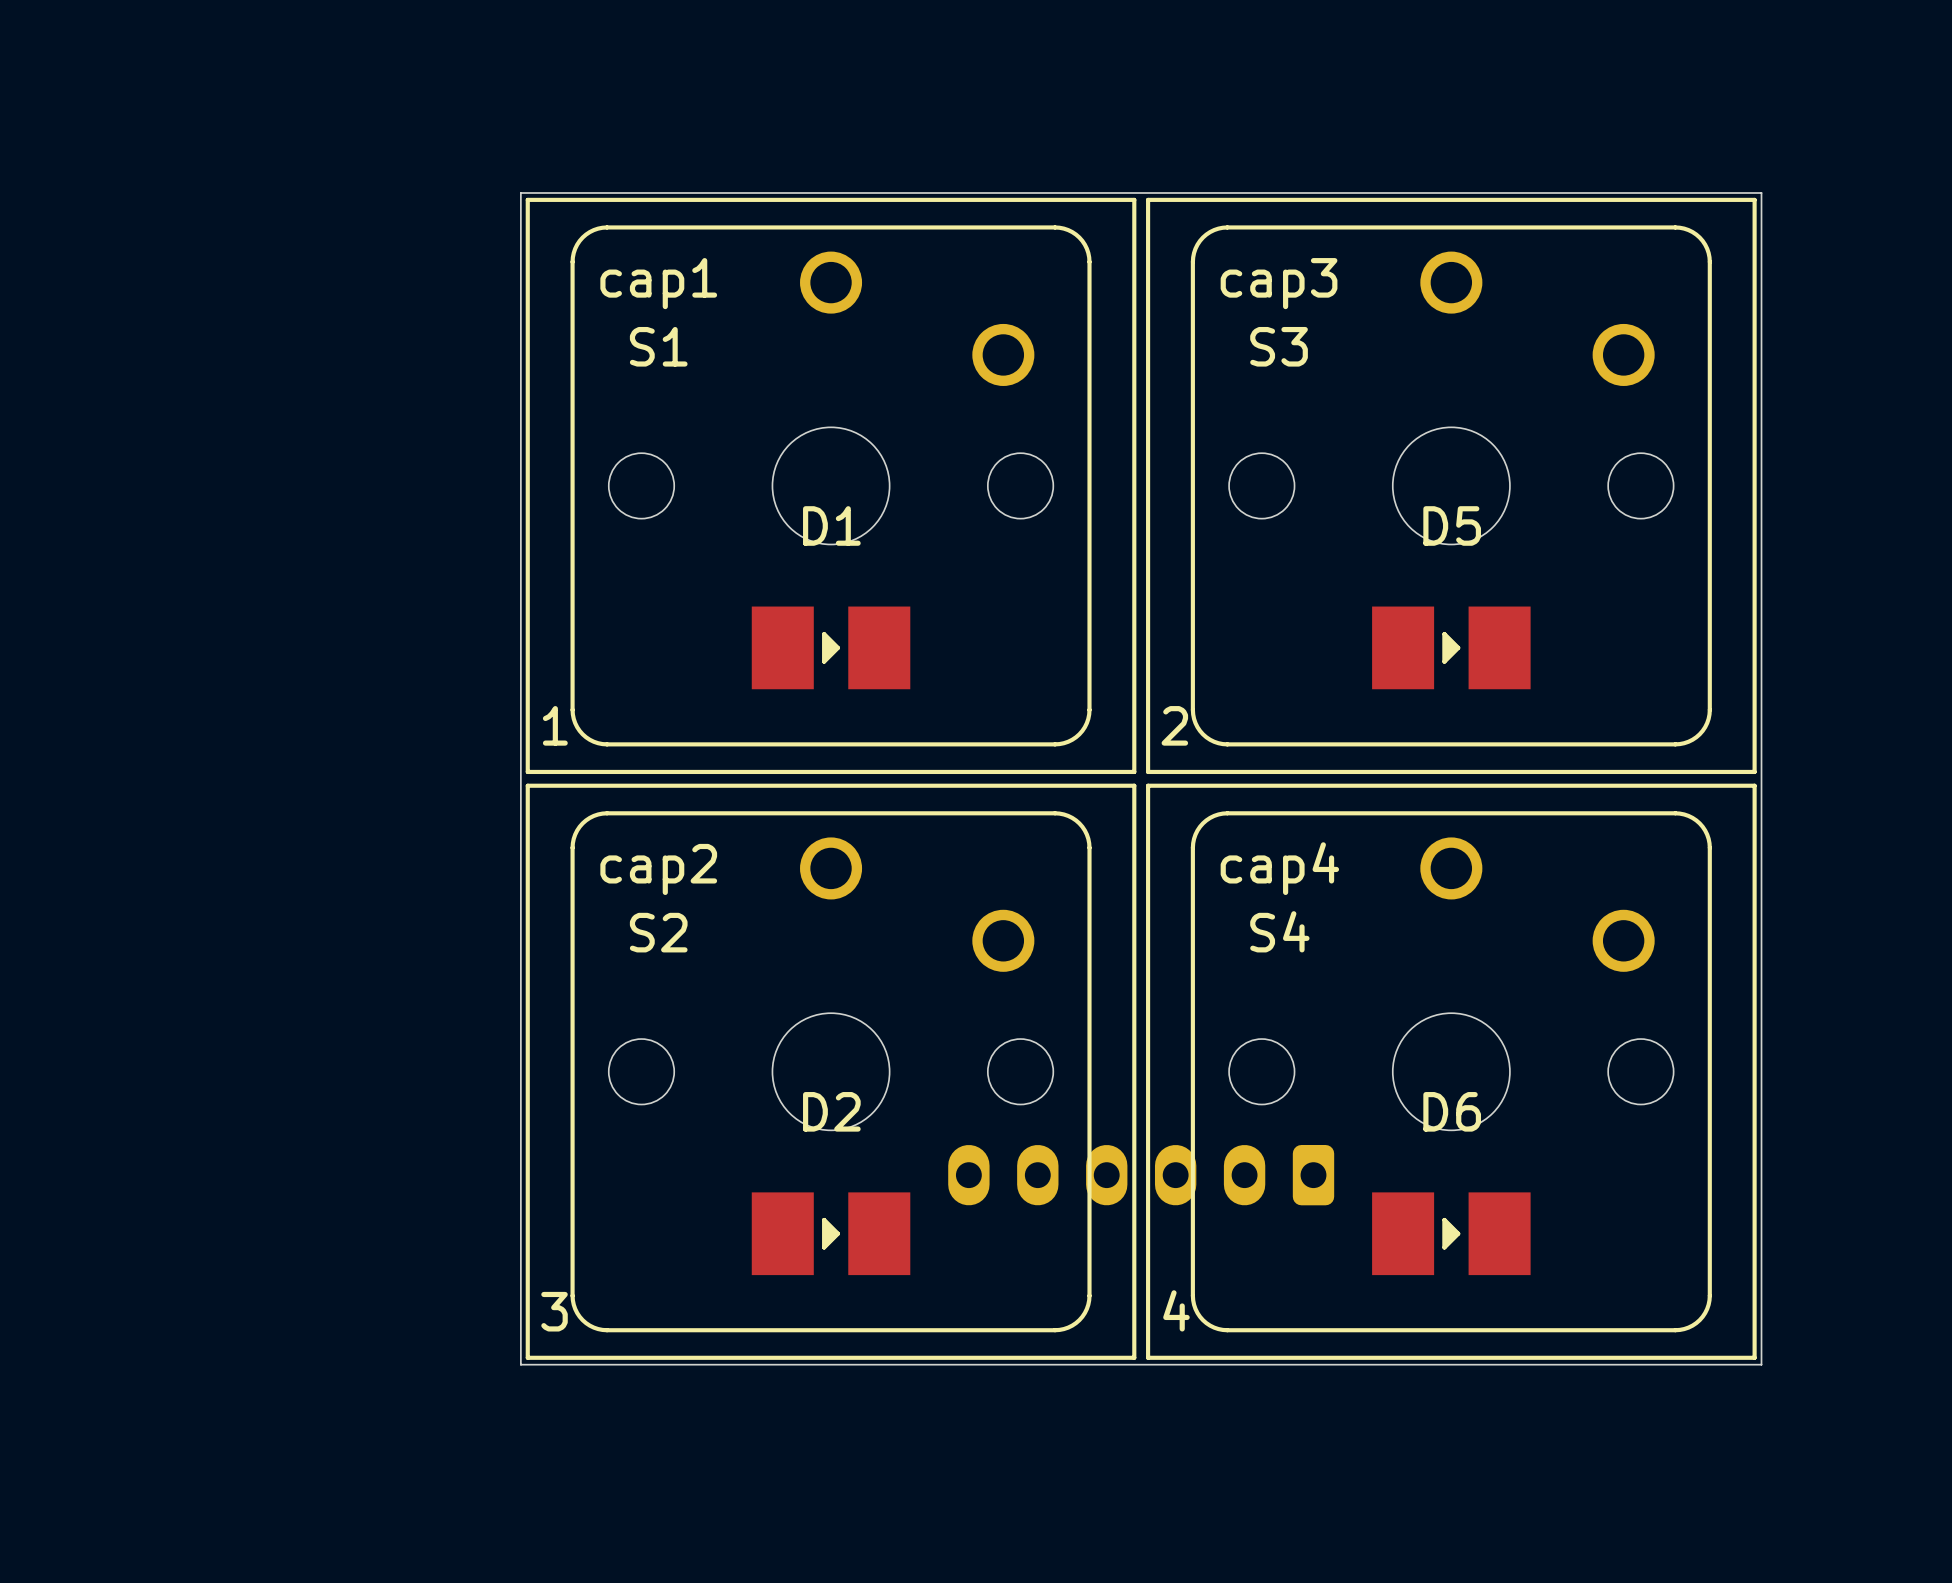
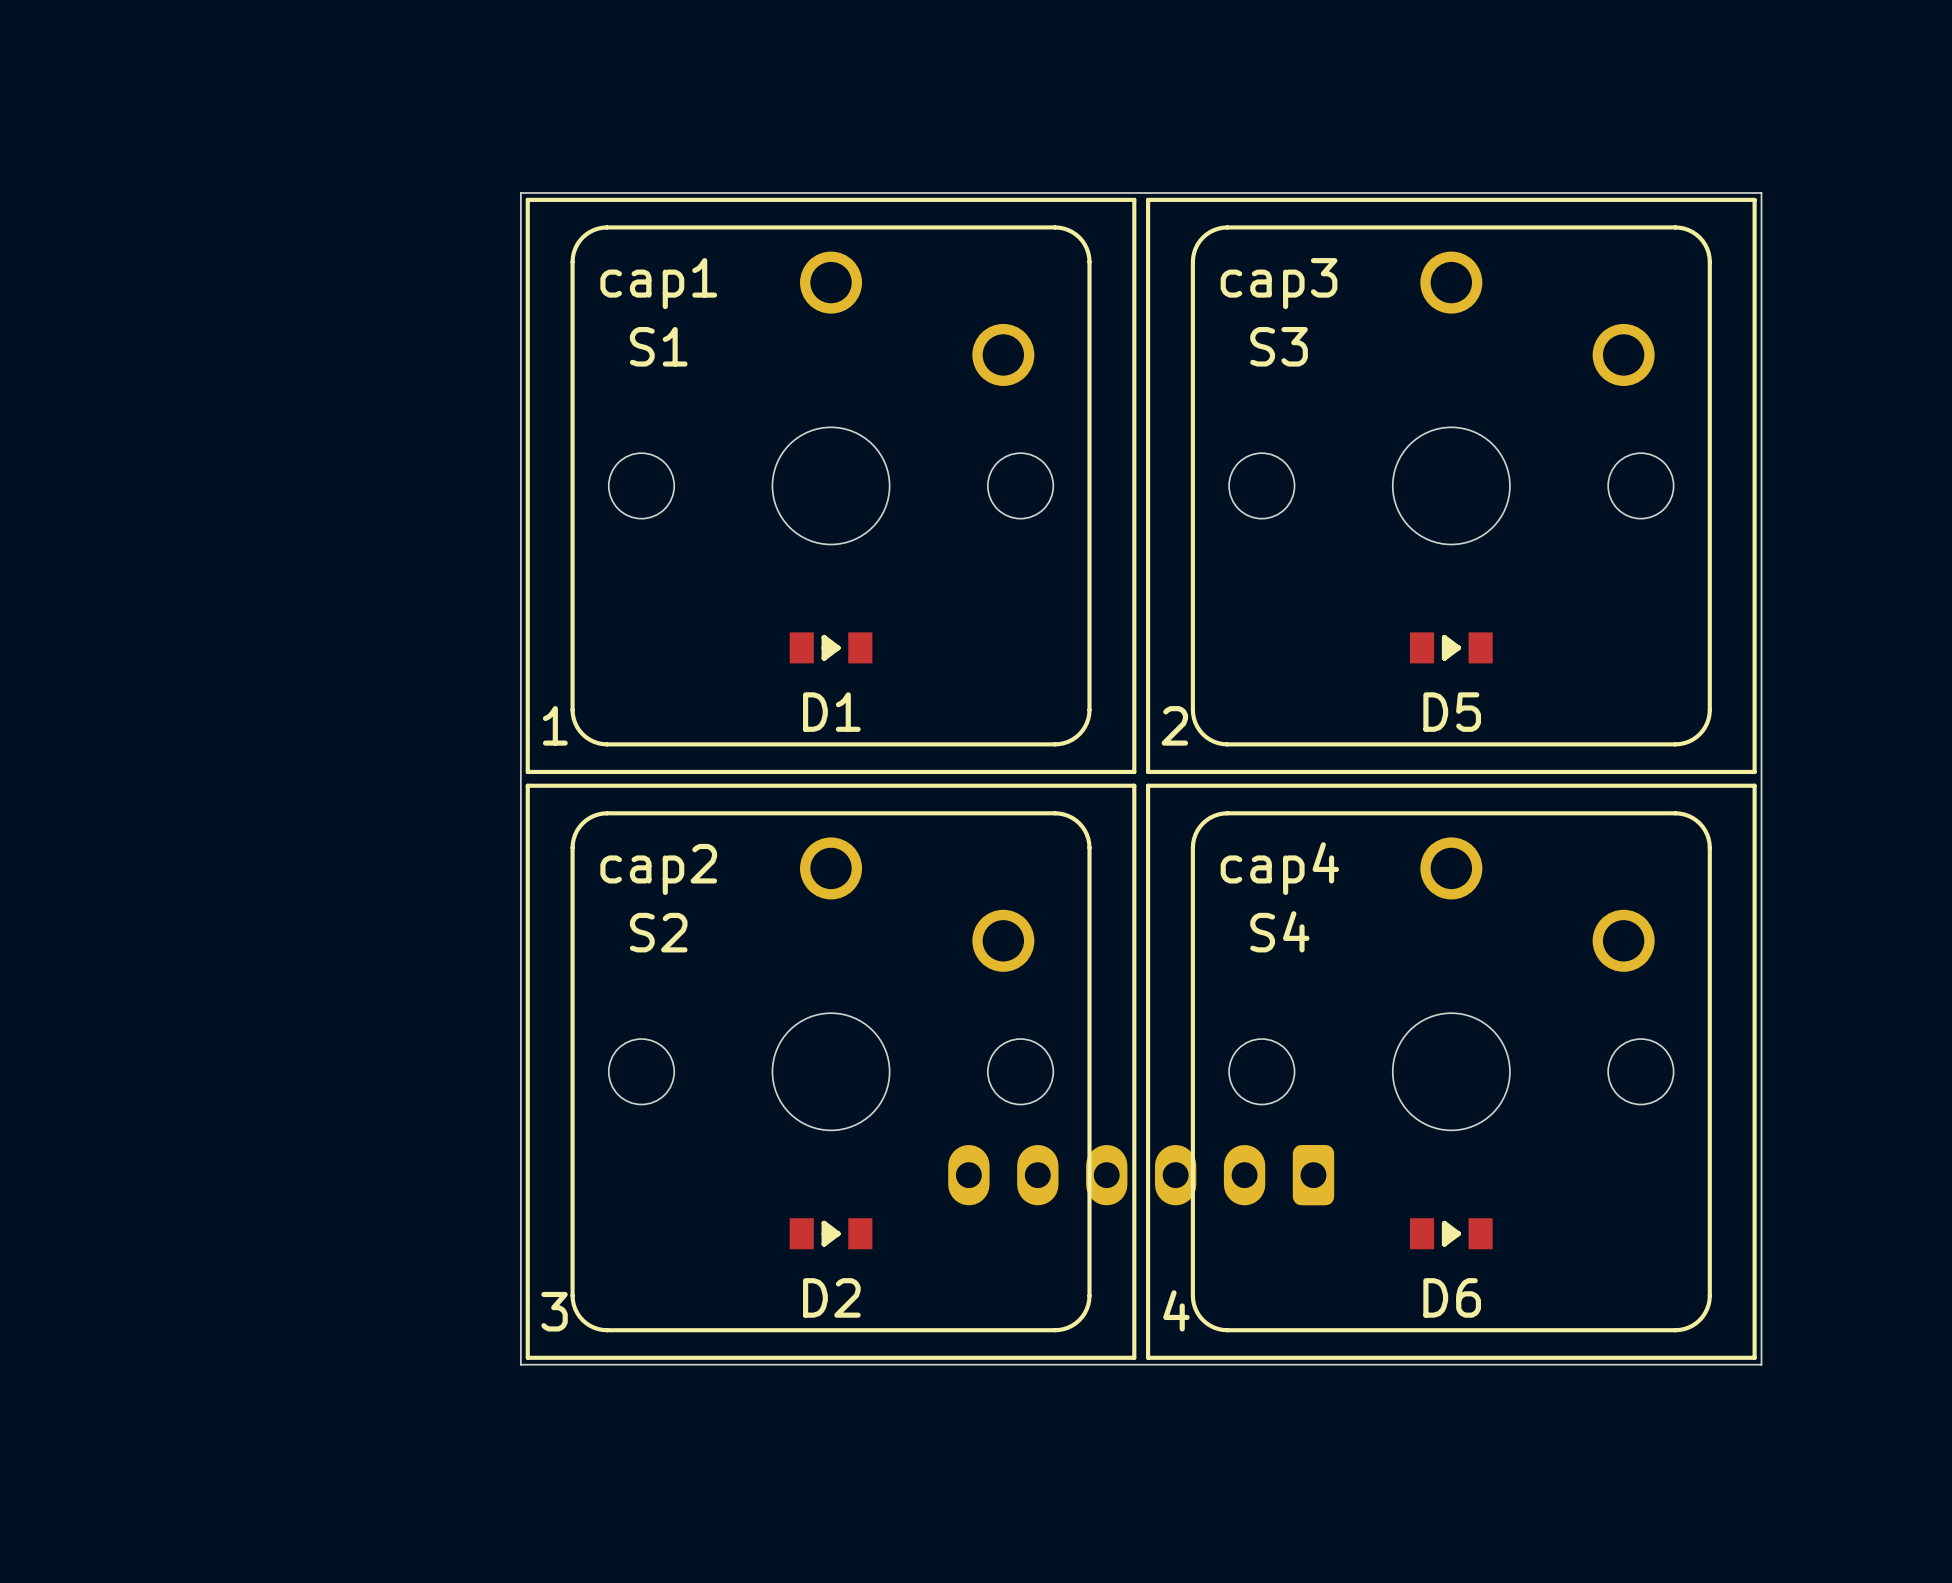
D1 name position: D1 (831, 525) -> D1 (831, 712)
D5 name position: D5 (1452, 525) -> D5 (1452, 712)
D1 footprint: [751, 606, 911, 690] -> [789, 632, 873, 664]
D5 footprint: [1372, 606, 1531, 690] -> [1409, 632, 1493, 664]
D2 name position: D2 (831, 1111) -> D2 (831, 1297)
D6 name position: D6 (1452, 1111) -> D6 (1452, 1297)
D2 footprint: [751, 1192, 911, 1276] -> [789, 1218, 873, 1250]
D6 footprint: [1372, 1192, 1531, 1276] -> [1409, 1218, 1493, 1250]

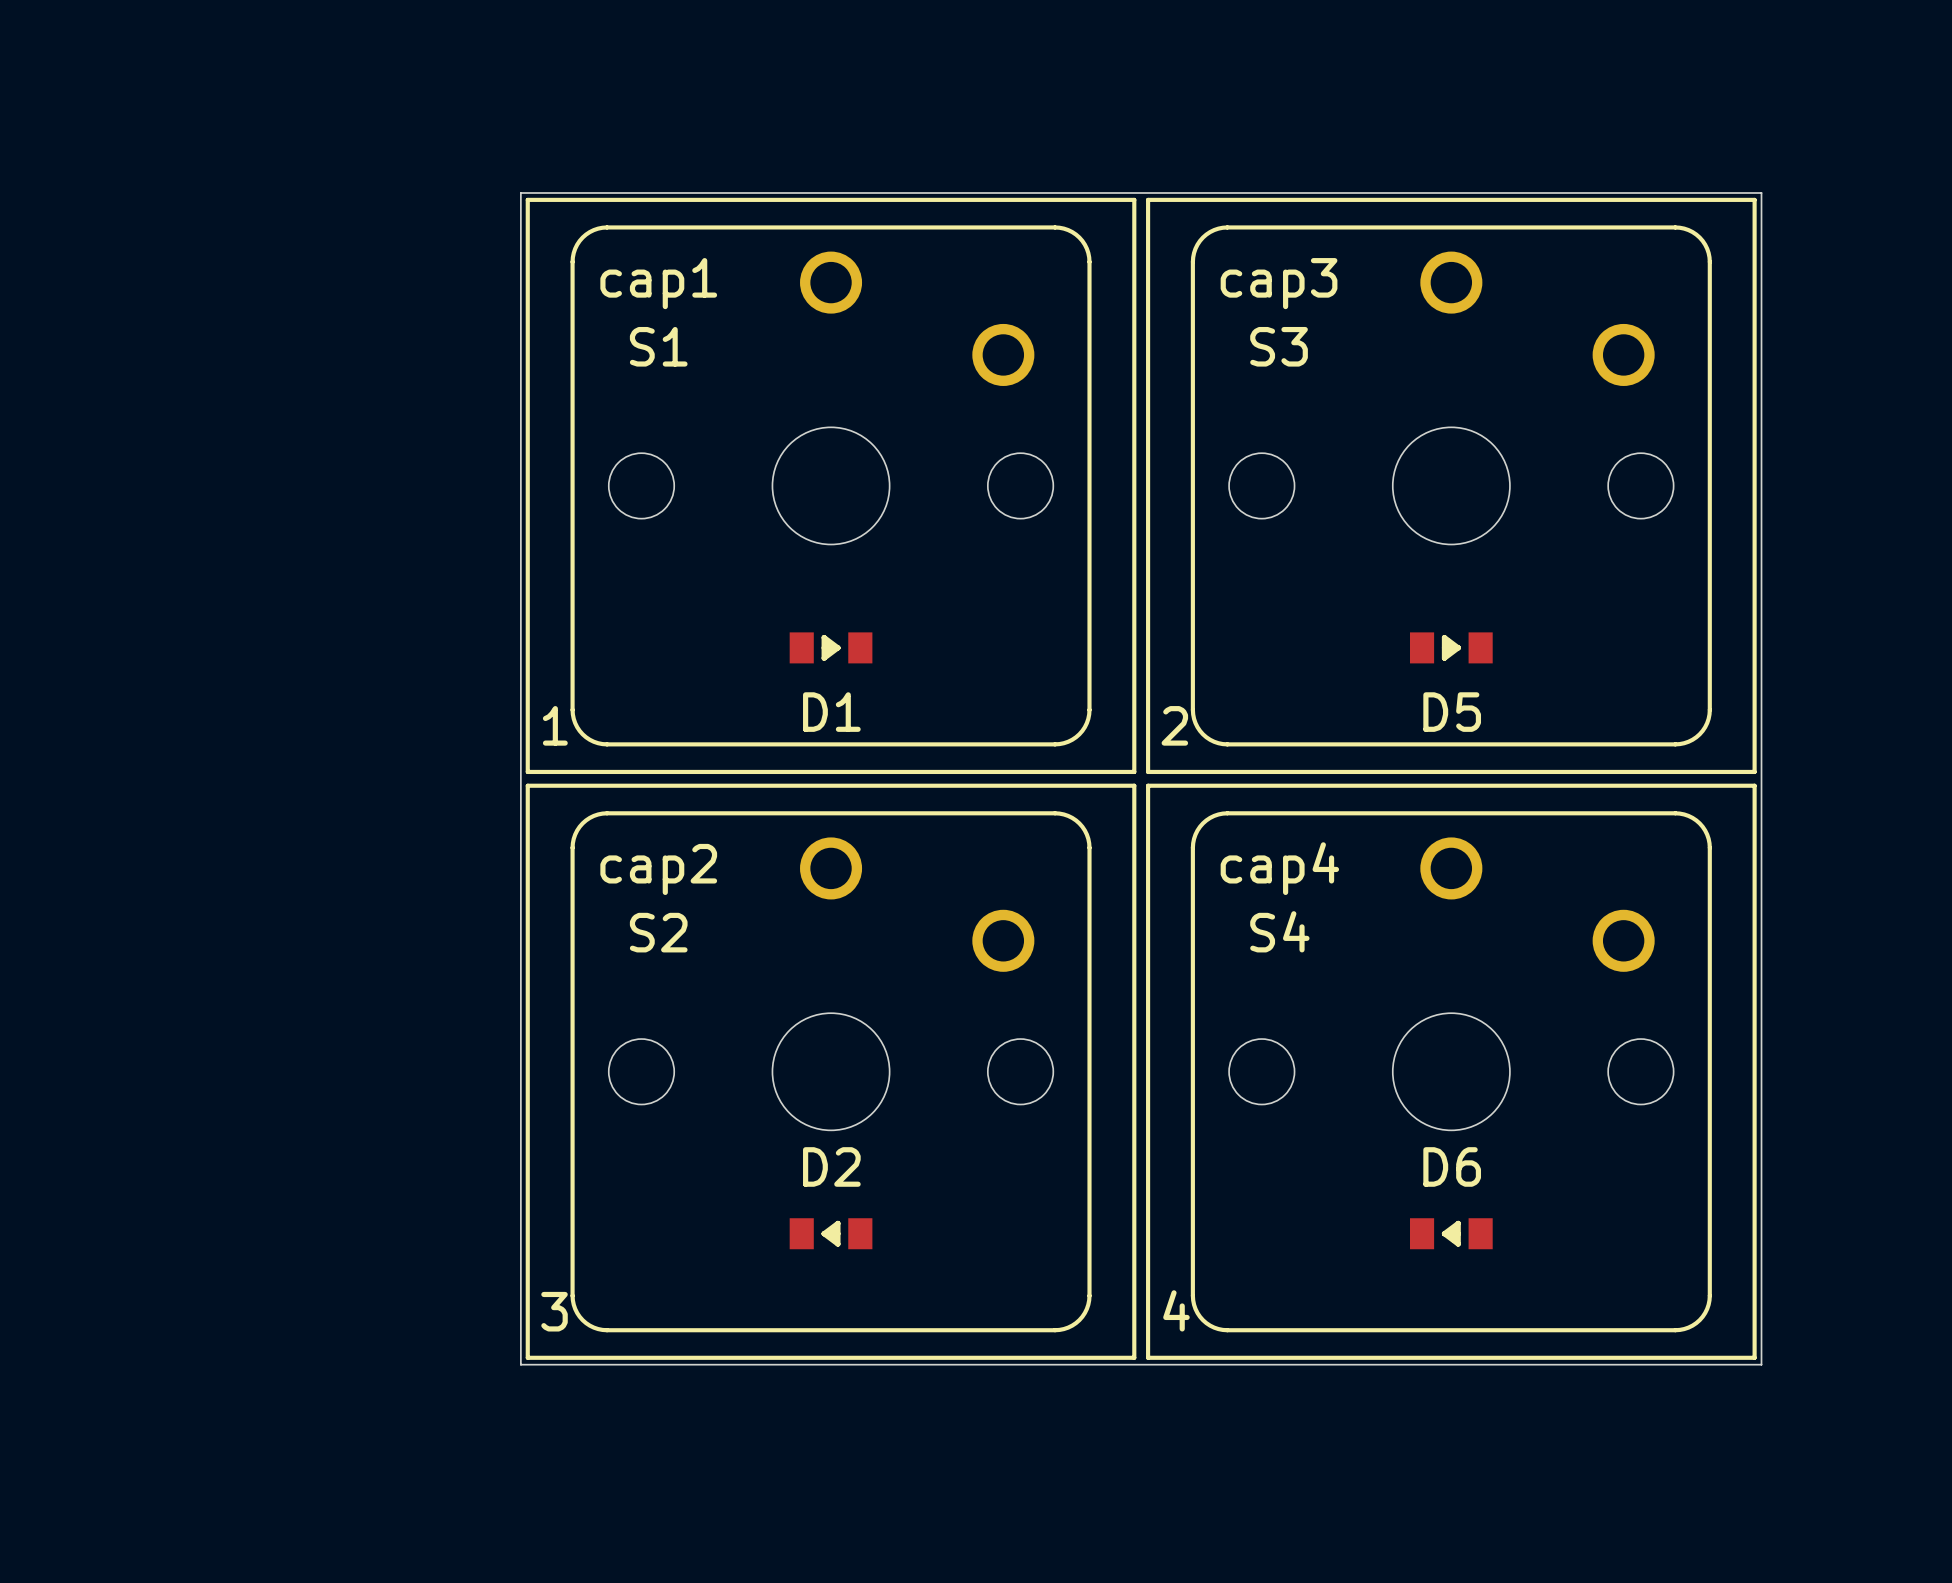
part: (1141, 1175) -> none
D2 rotation: 0° (831, 1233) -> 180° (831, 1233)
D6 rotation: 0° (1451, 1233) -> 180° (1451, 1233)

